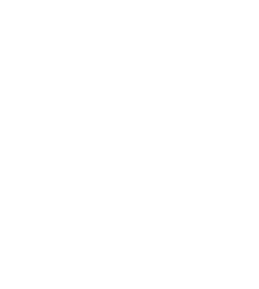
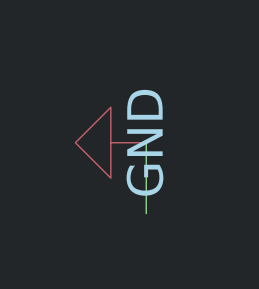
power symbol: none -> GND (110, 142)
wire: none -> (146, 142) (146, 213)

